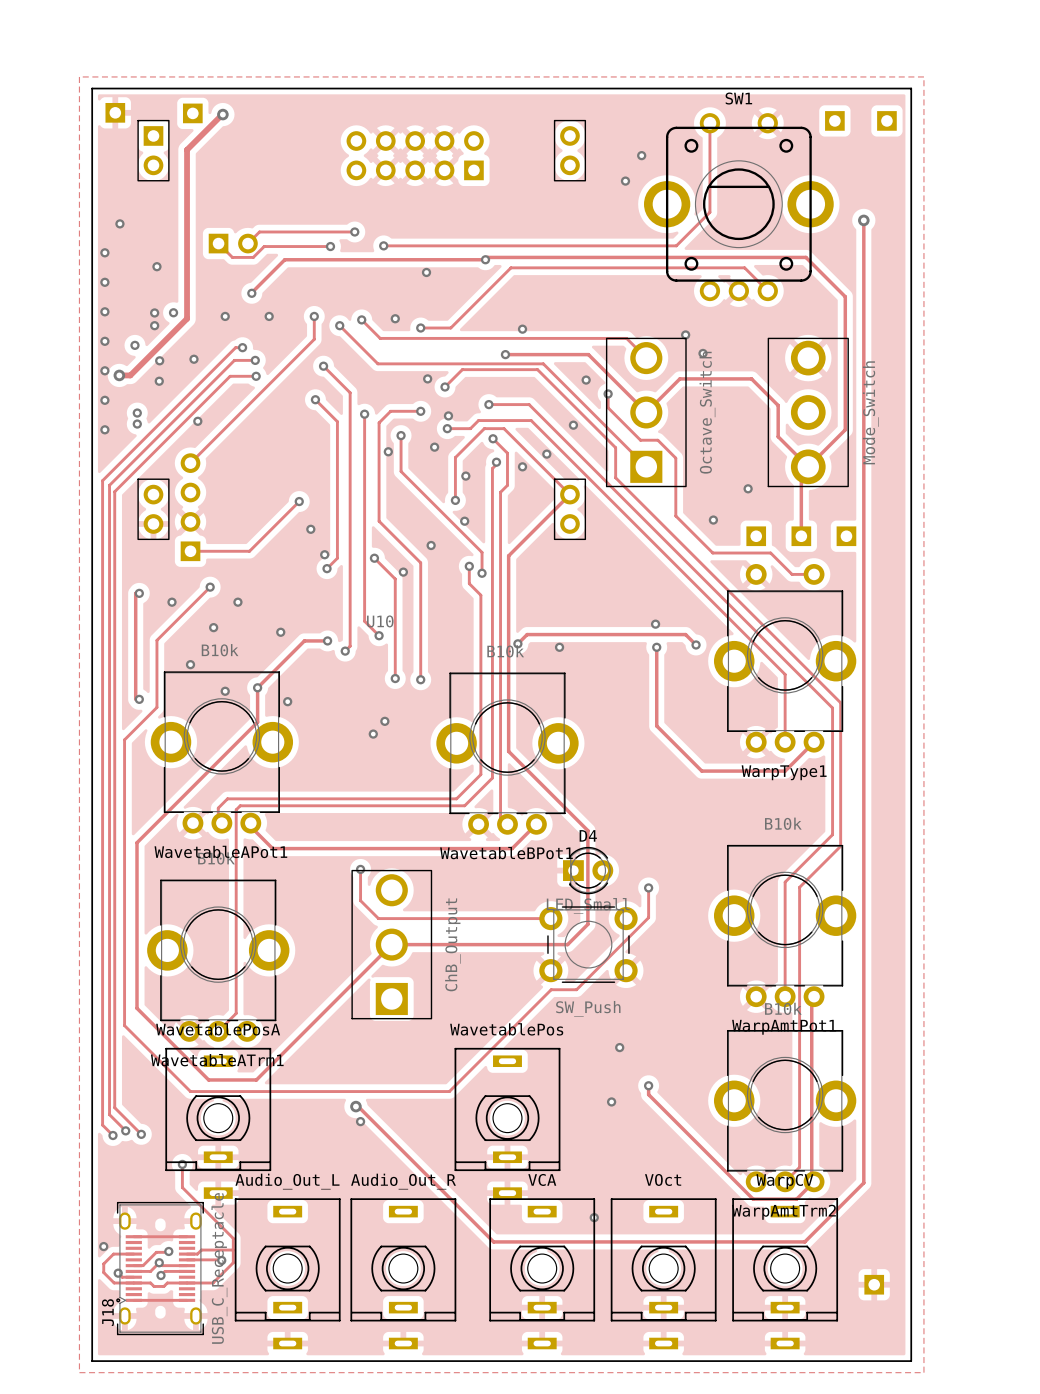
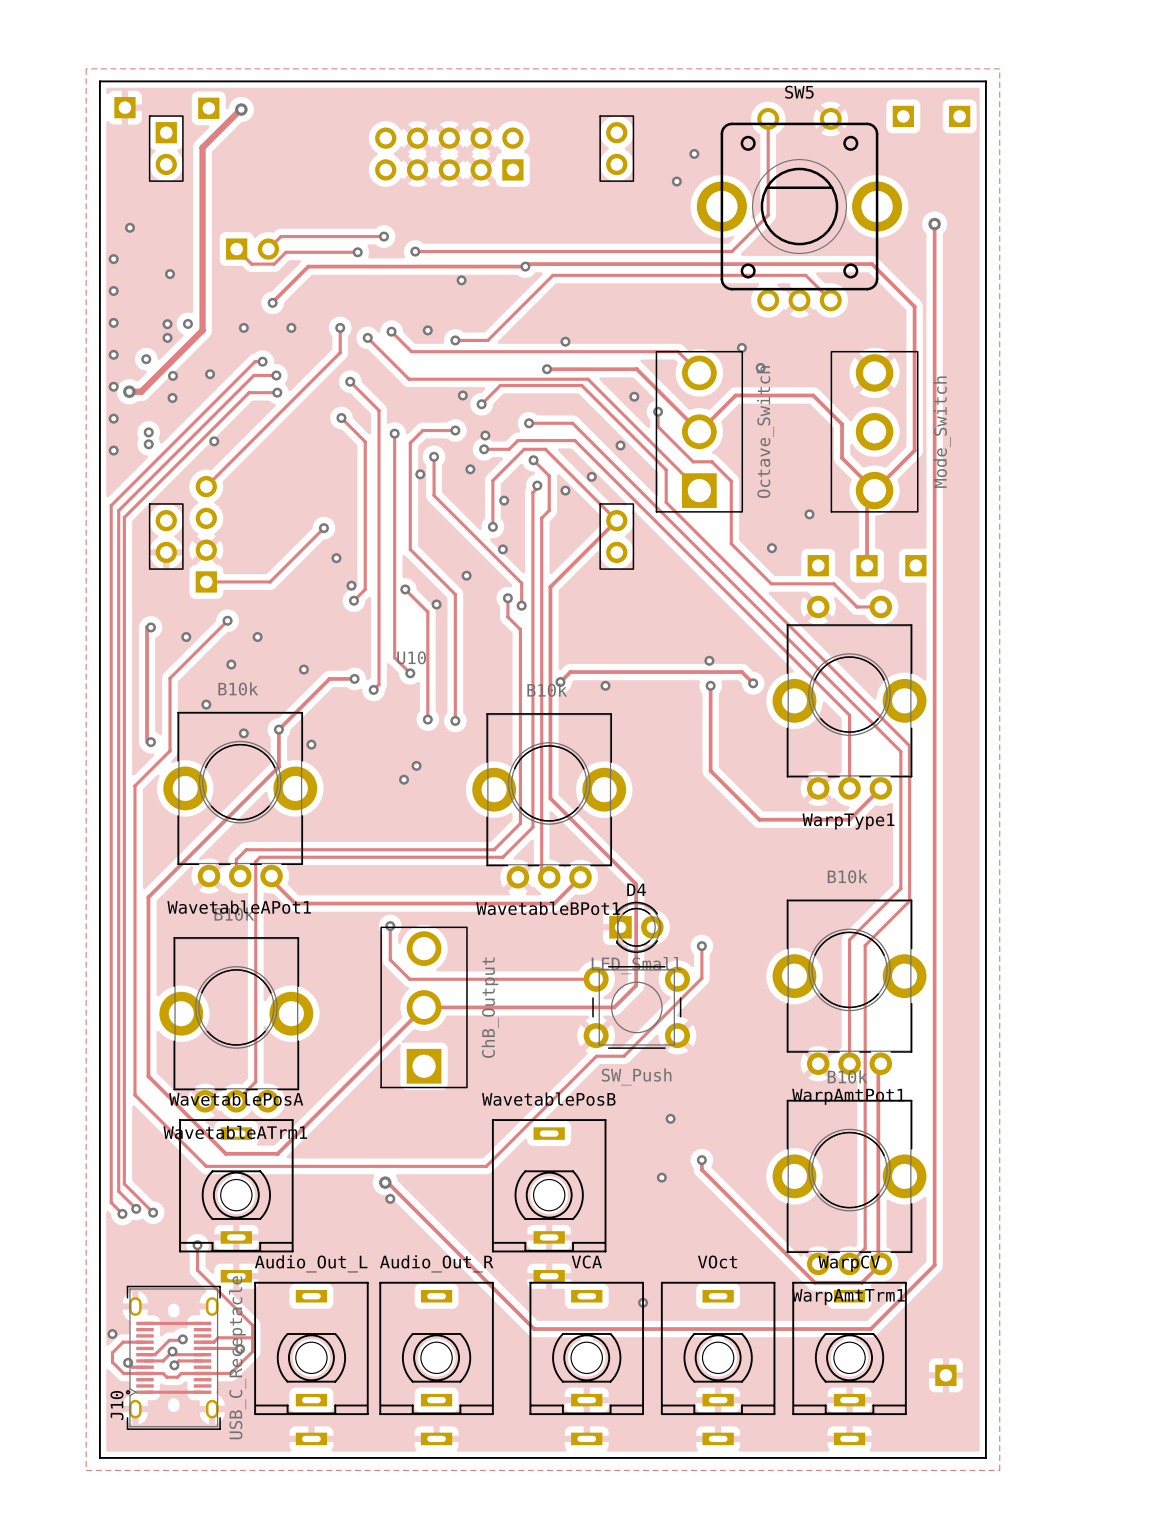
SW1 name: SW1 (738, 98) -> SW5 (799, 92)
part value: WavetablePos (506, 1029) -> WavetablePosB (548, 1099)
WarpAmtTrm2 name: WarpAmtTrm2 (784, 1212) -> WarpAmtTrm1 (848, 1297)
J18 name: J18 (107, 1312) -> J10 (117, 1405)

